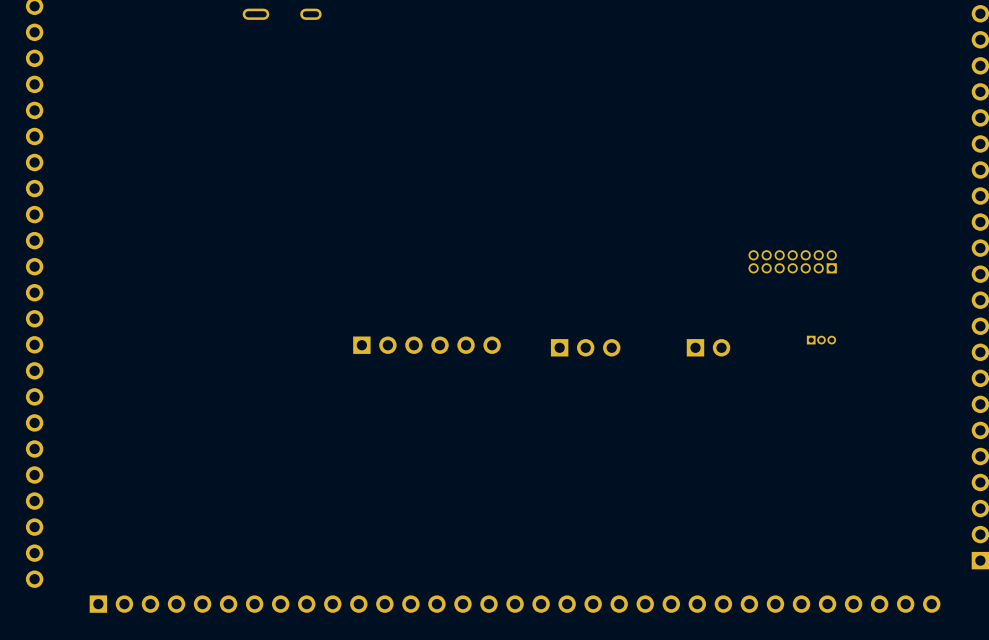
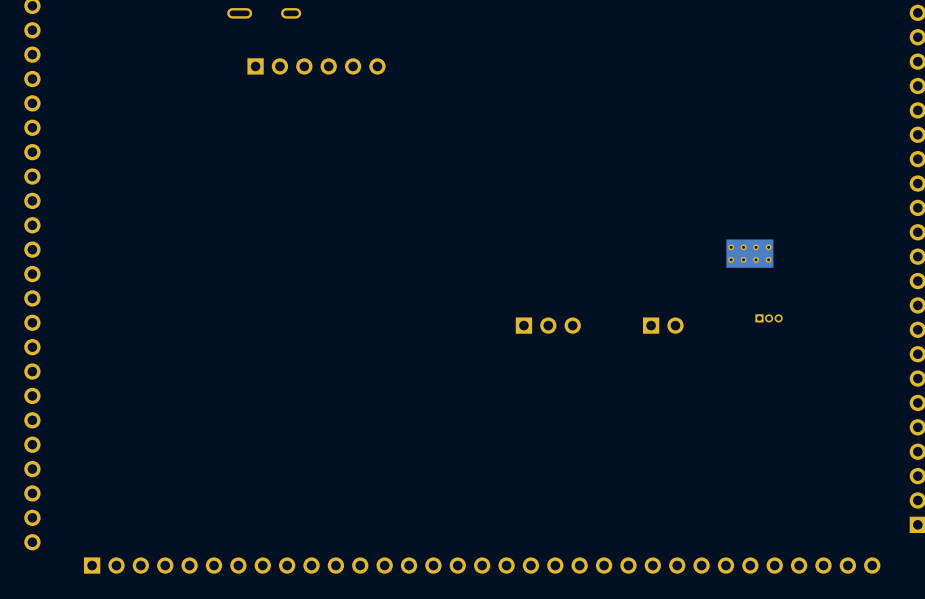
part: none -> (316, 66)
part: (792, 261) -> none
part: none -> (749, 253)
part: (426, 345) -> none

